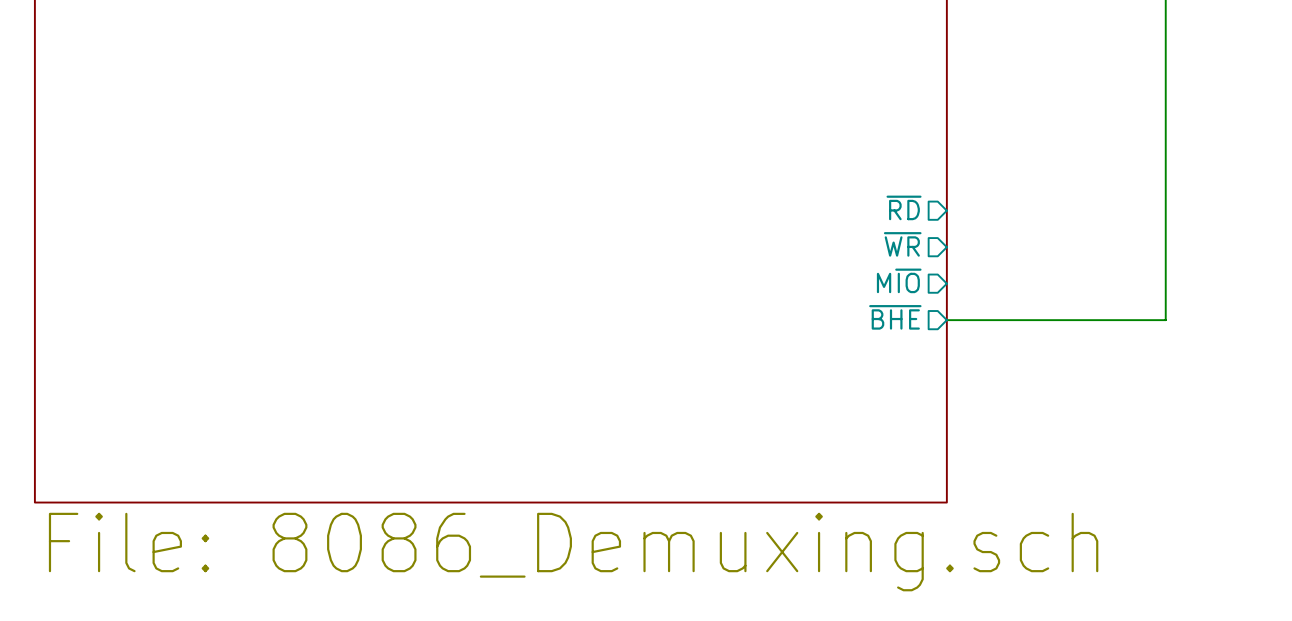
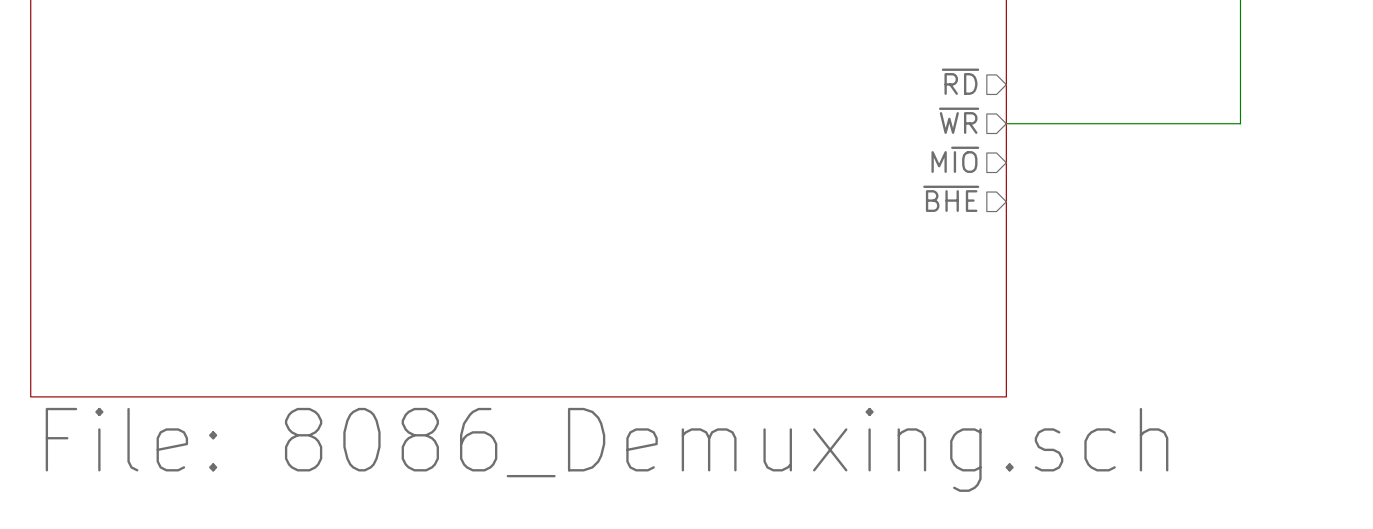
wire: (1165, 247) (1165, 320) (946, 320) -> (1240, 123) (1006, 123)

